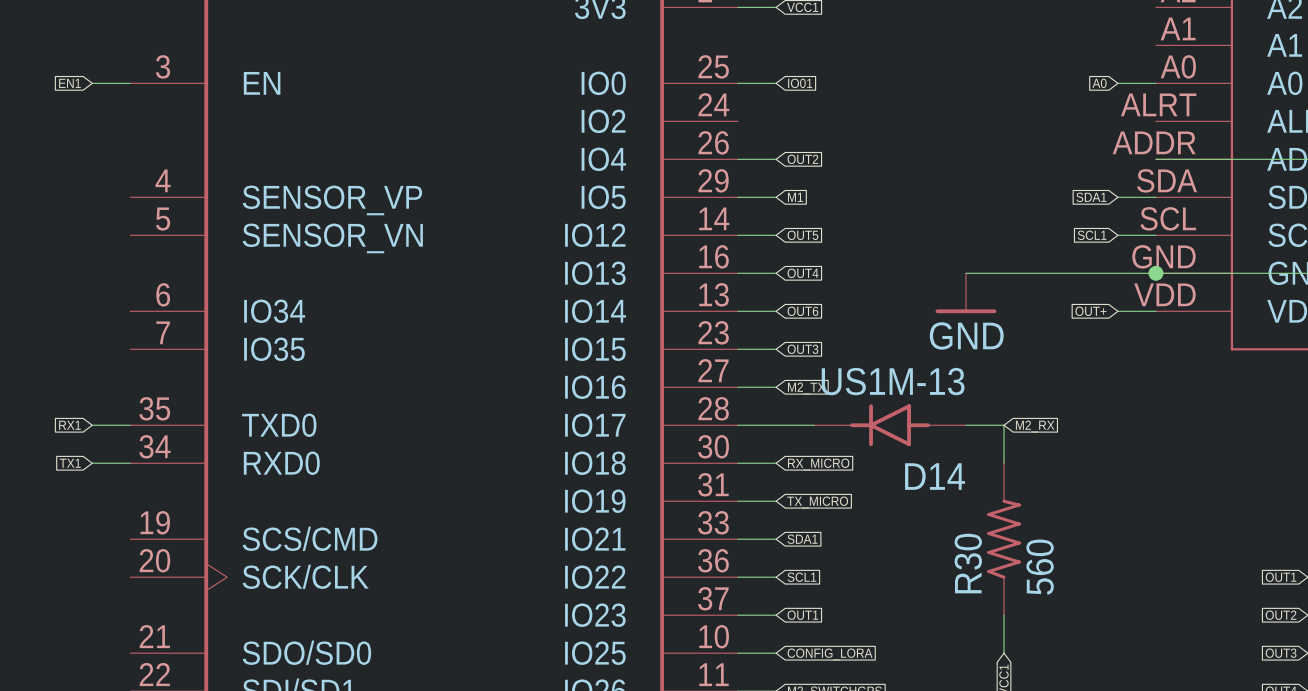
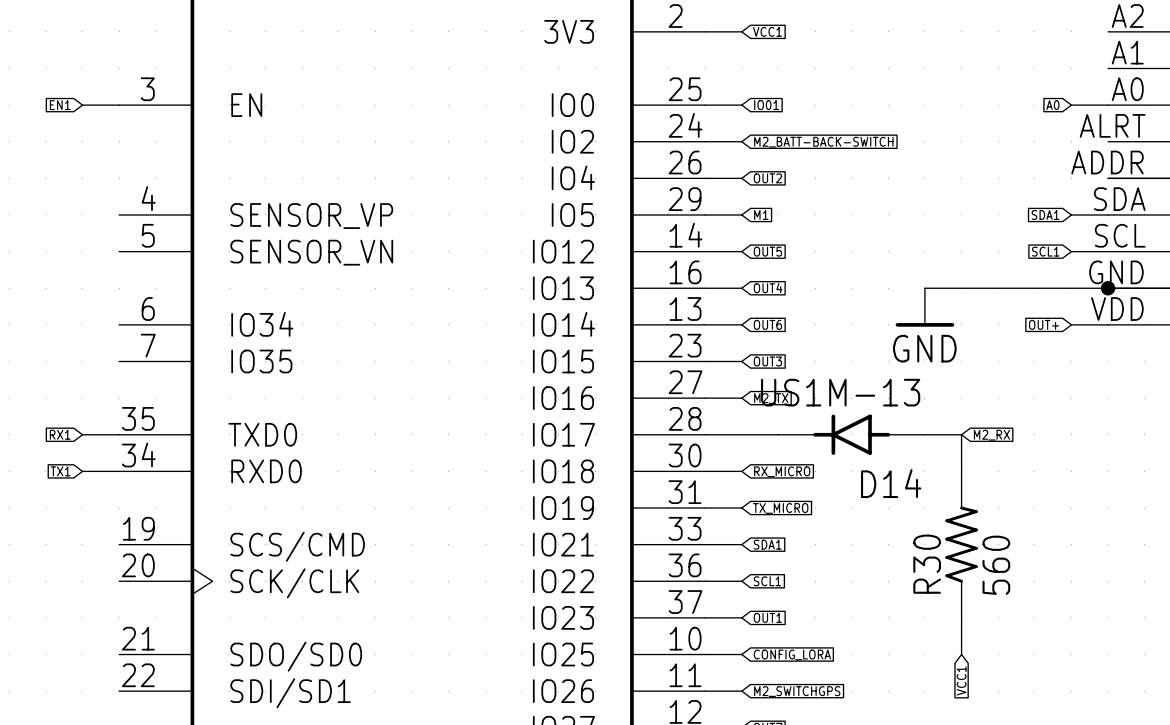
wire: none -> (705, 141) (741, 141)
global label: none -> M2_BATT-BACK-SWITCH (823, 142)

